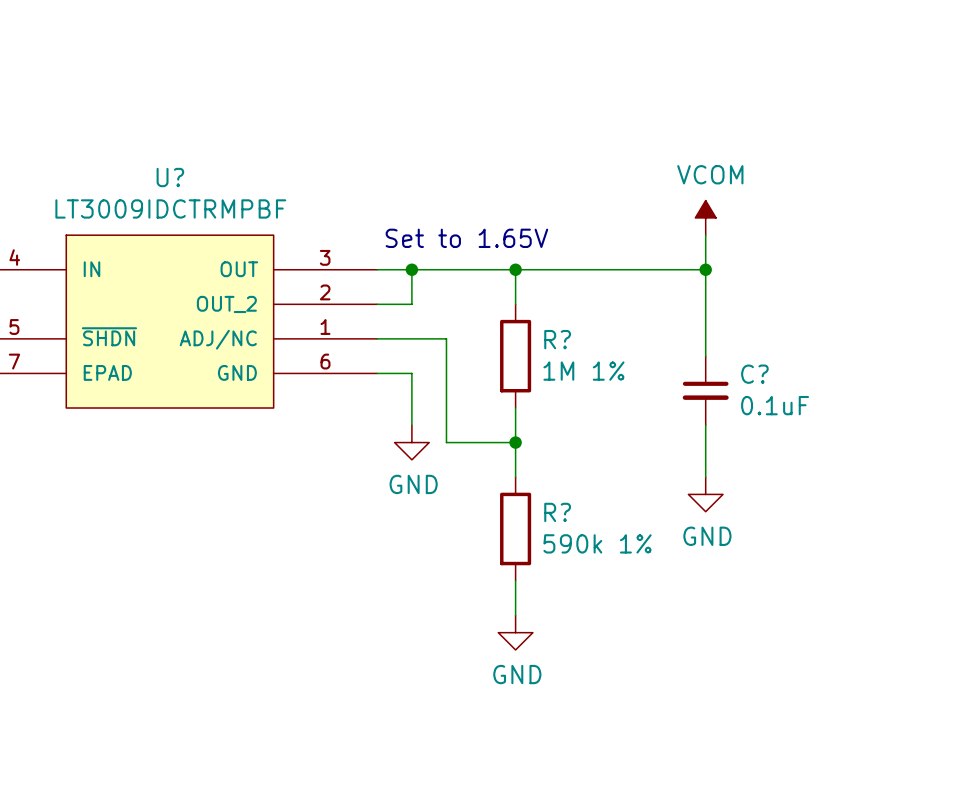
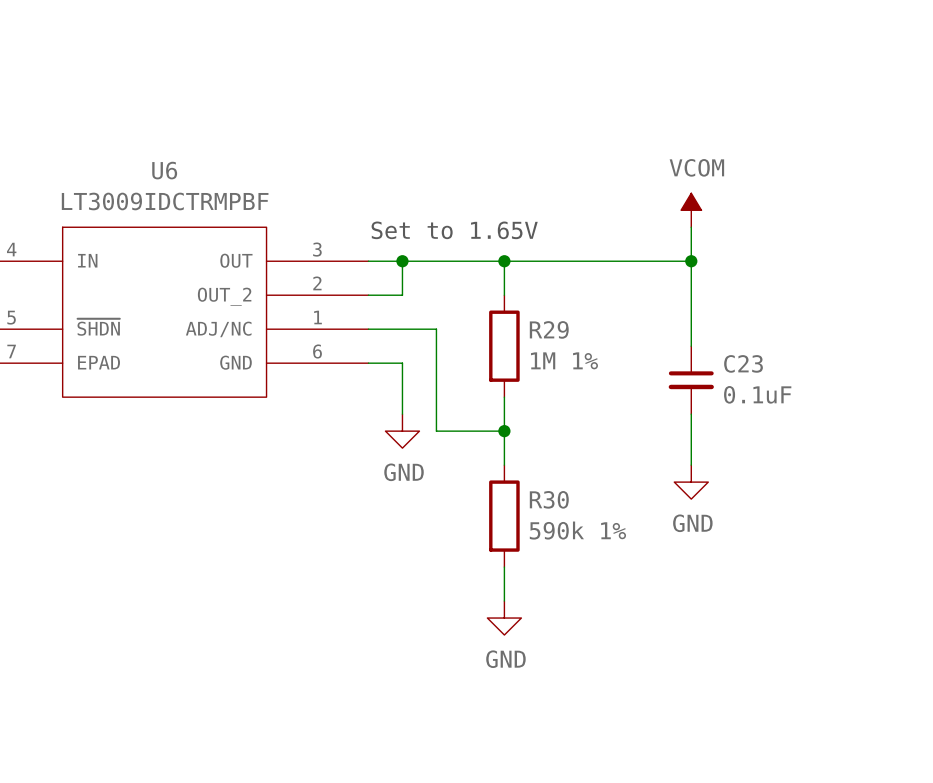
U? name: U? (170, 177) -> U6 (164, 170)
R? name: R? (557, 339) -> R29 (549, 329)
C? name: C? (754, 374) -> C23 (743, 363)
R? name: R? (557, 512) -> R30 (549, 499)

